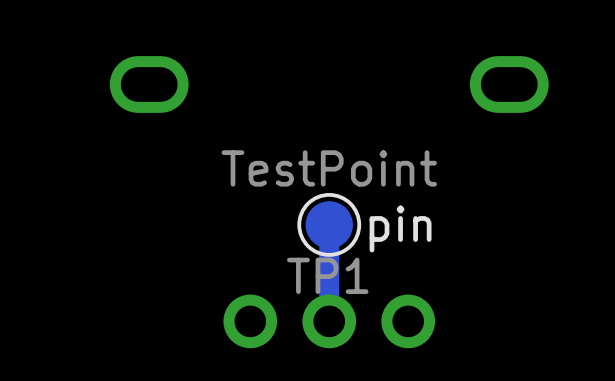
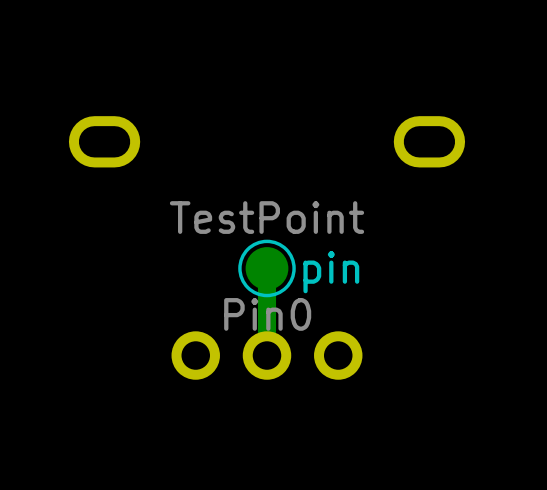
TP1 name: TP1 (327, 275) -> Pin0 (267, 314)

